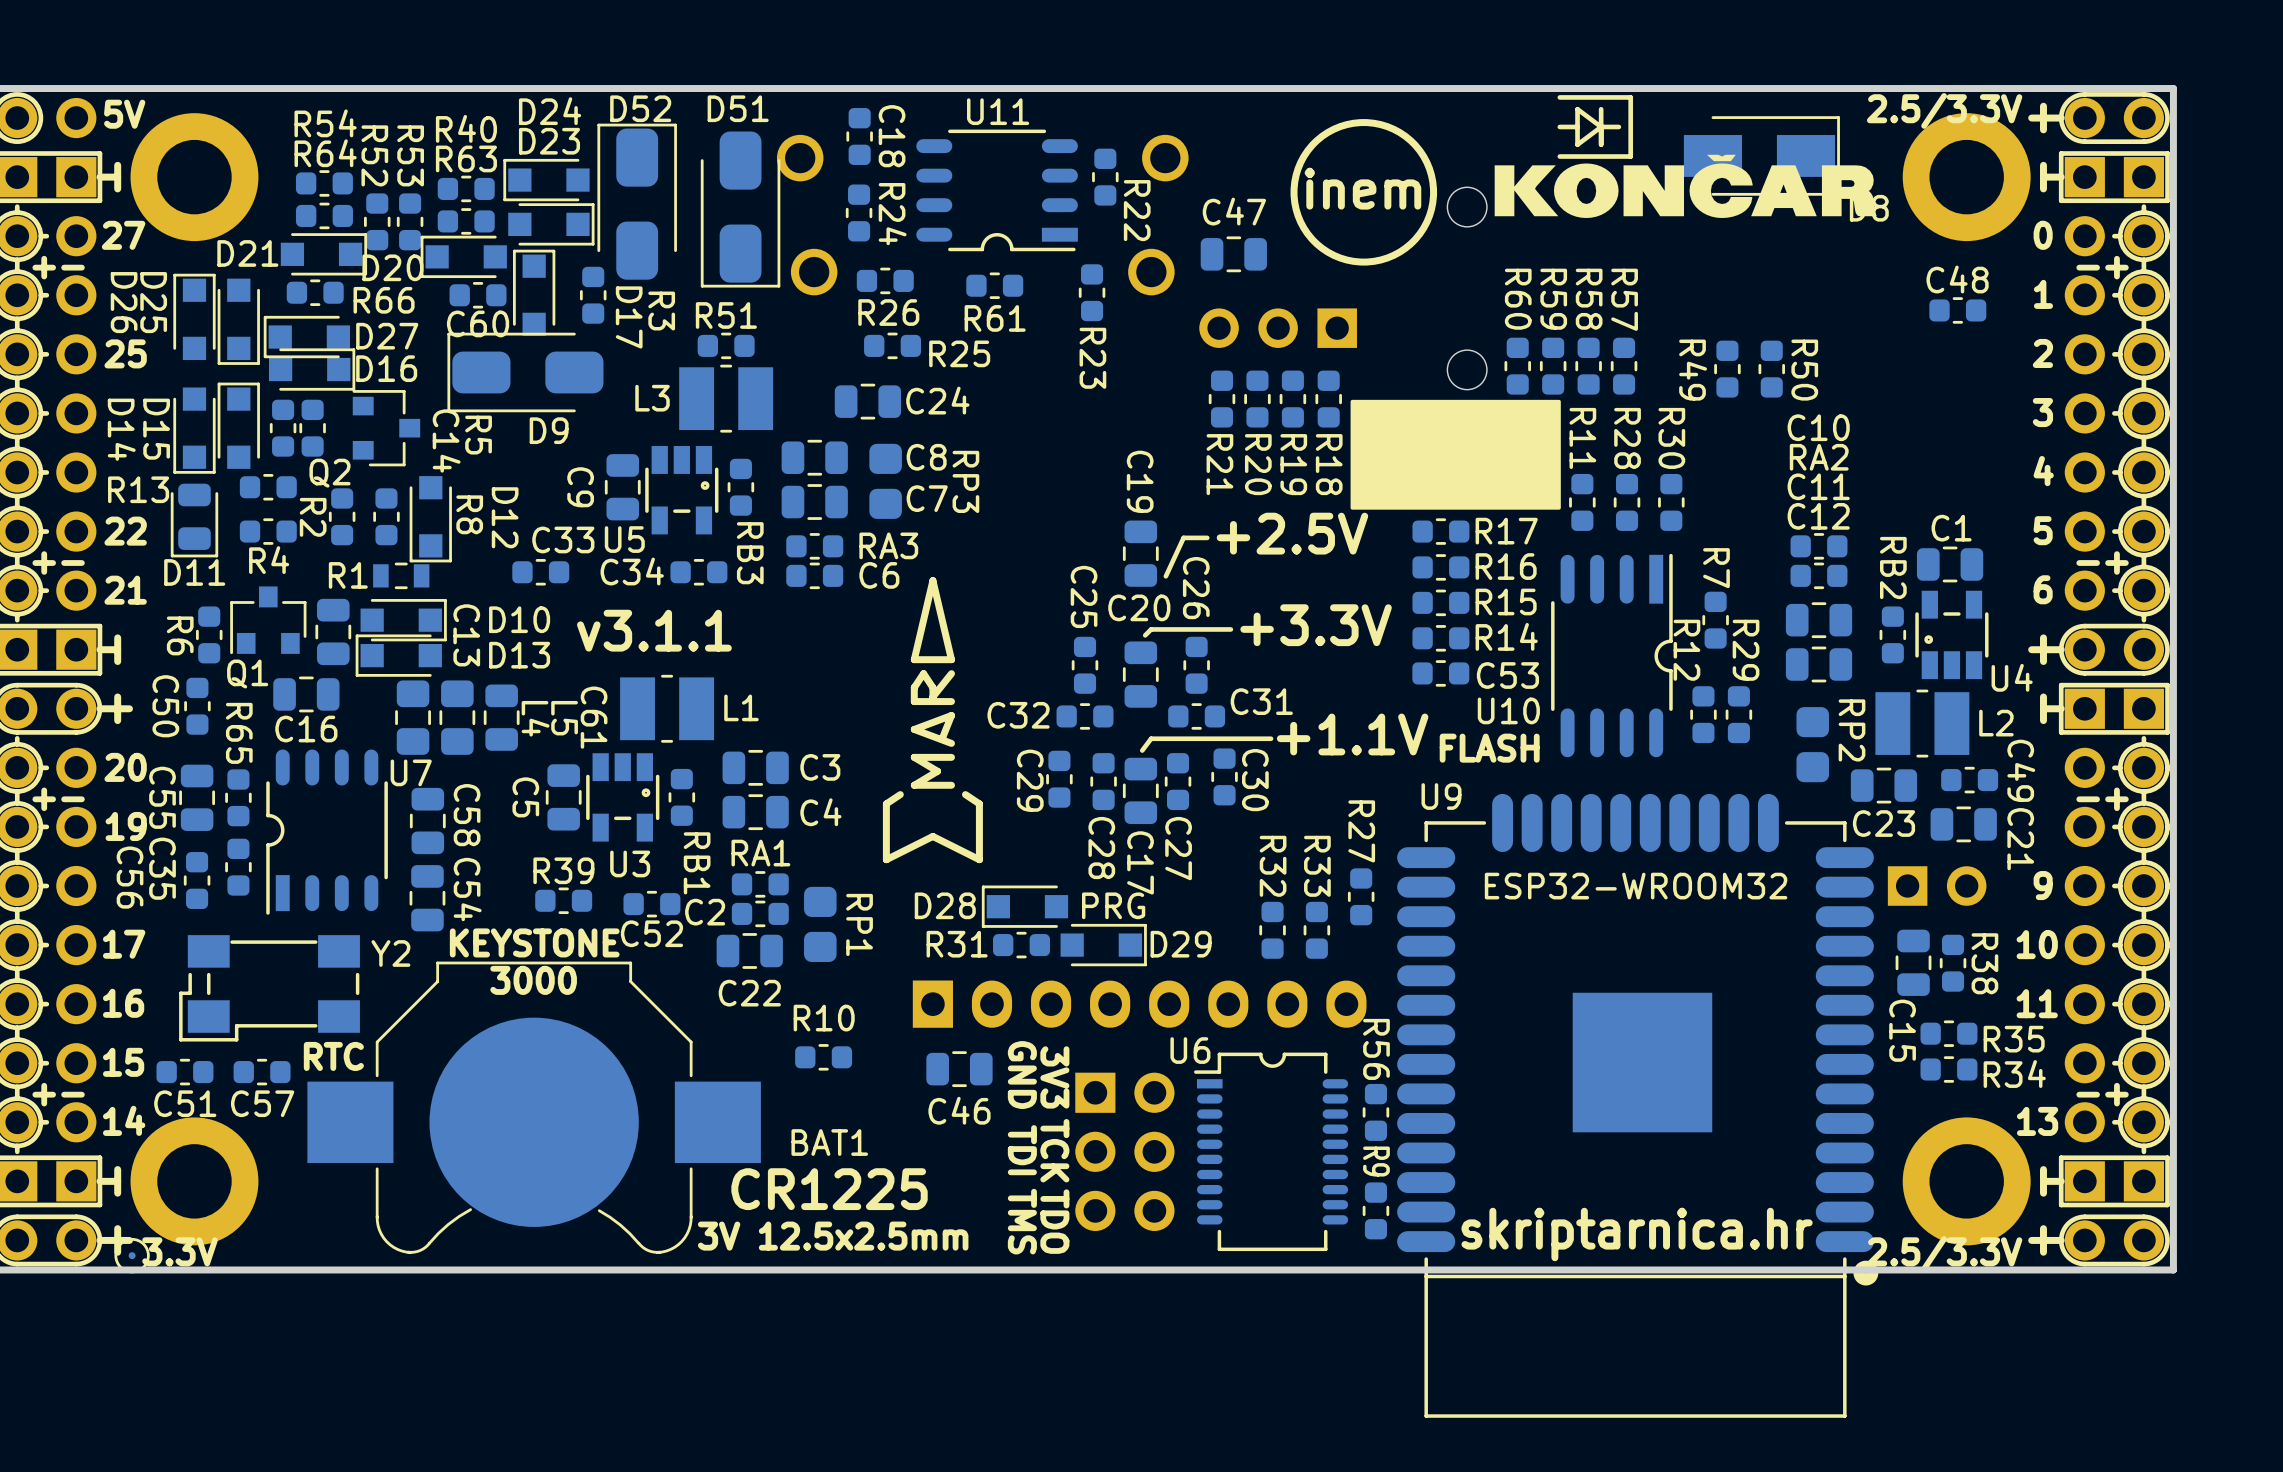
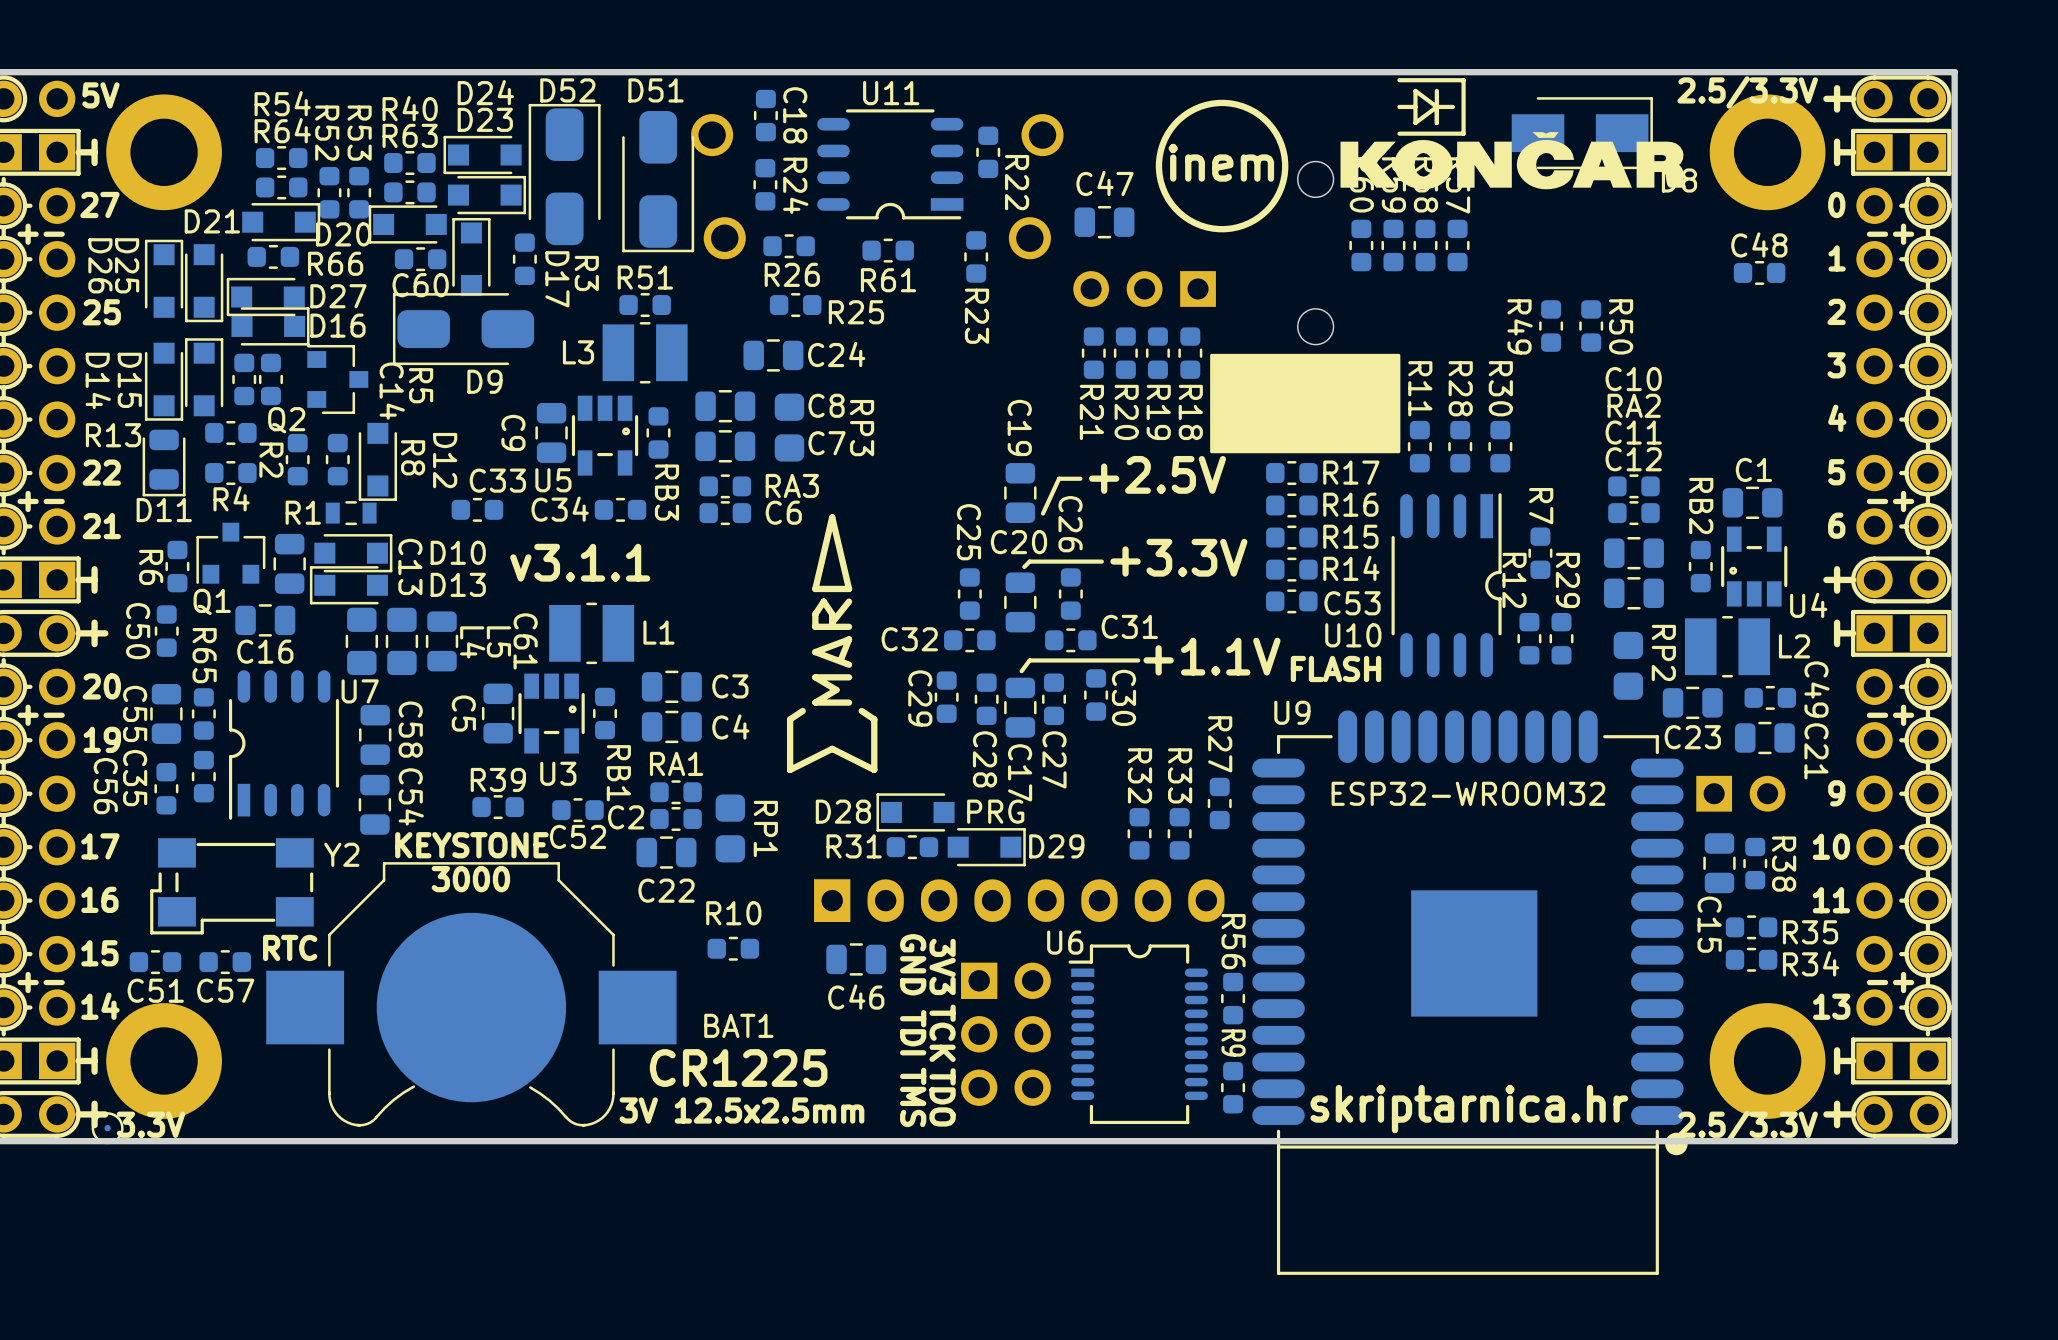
R60 position: (1517, 366) -> (1361, 245)
R59 position: (1553, 366) -> (1393, 245)
R58 position: (1588, 366) -> (1425, 245)
R57 position: (1624, 366) -> (1457, 245)

